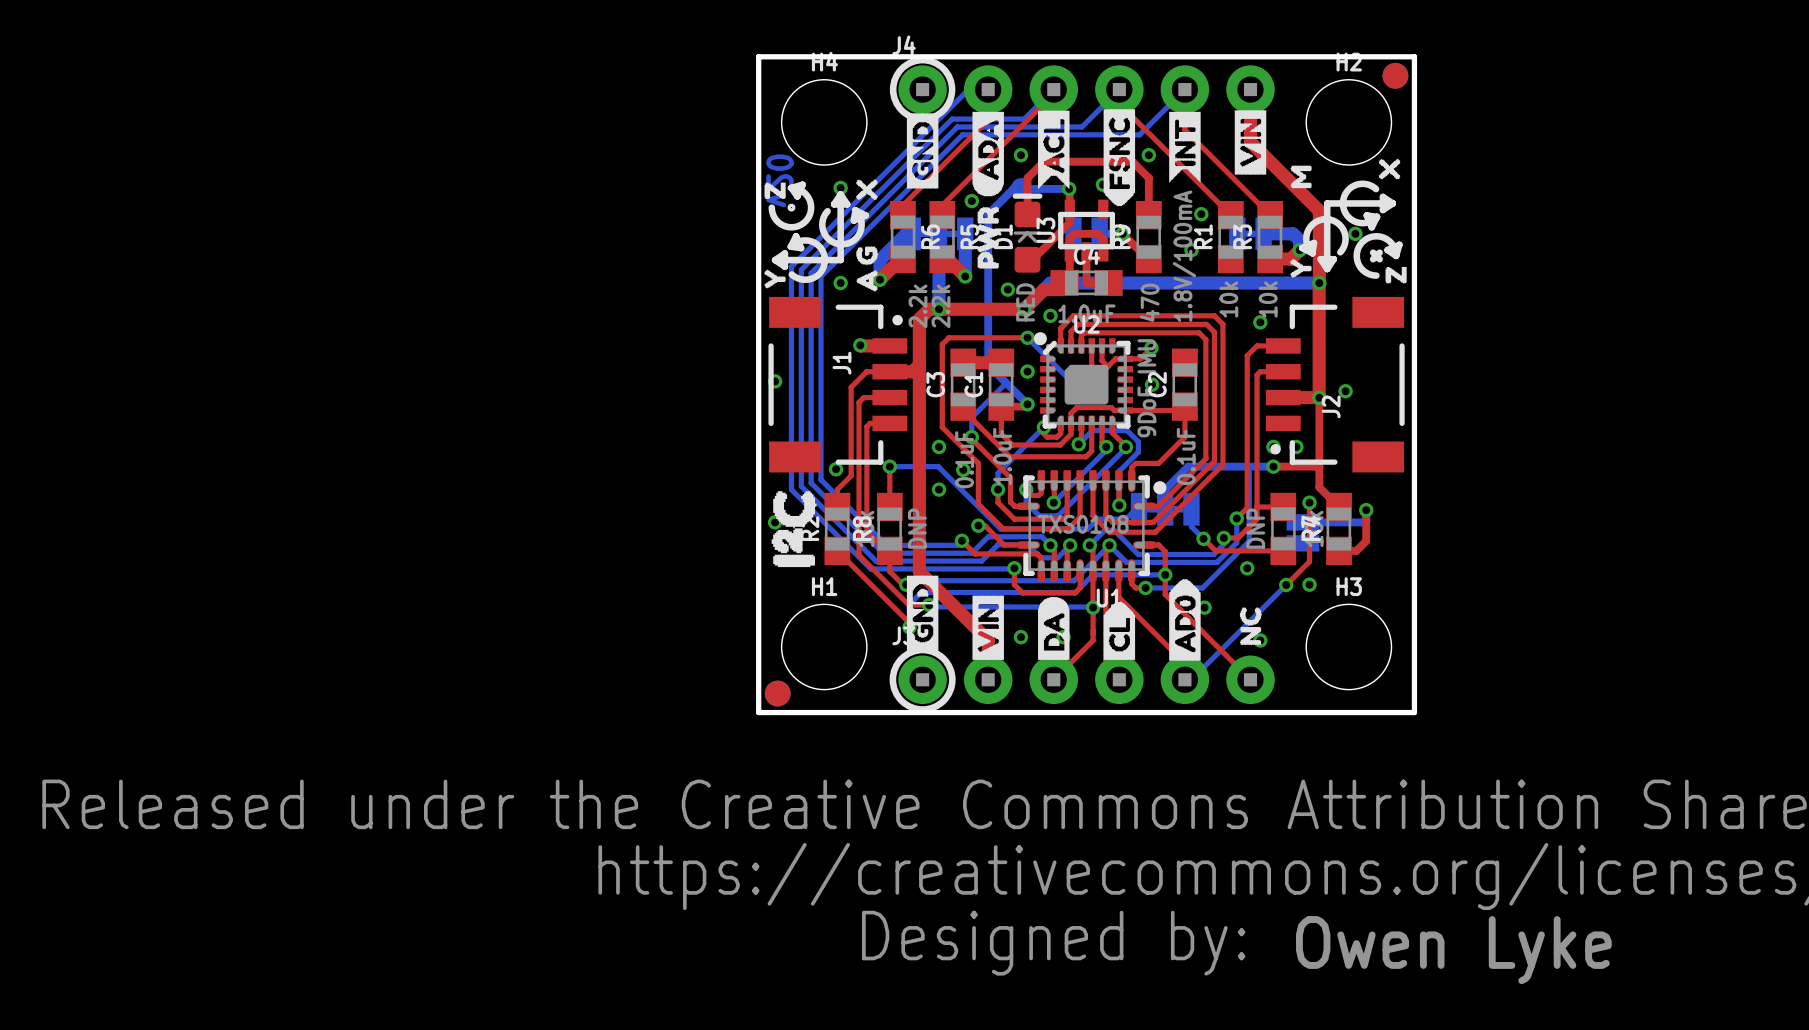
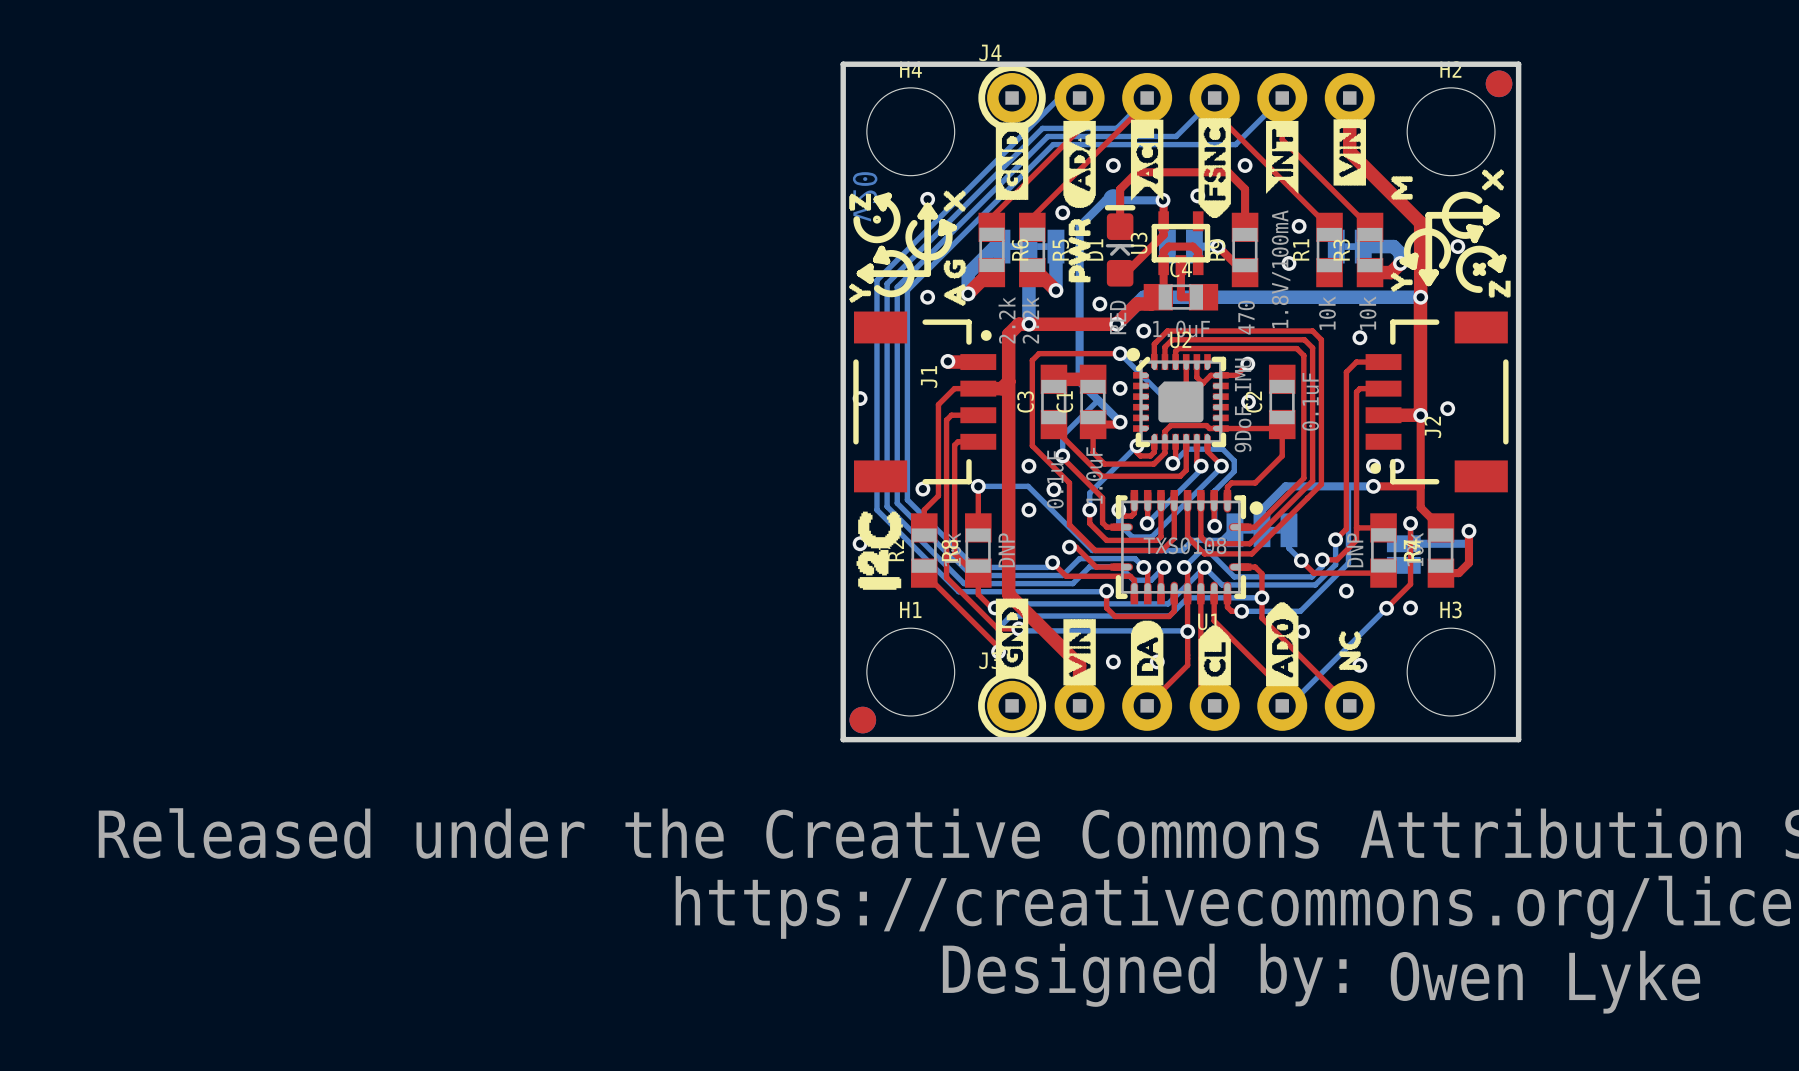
C2 value position: 0.1uF (1186, 456) -> 0.1uF (1310, 401)

